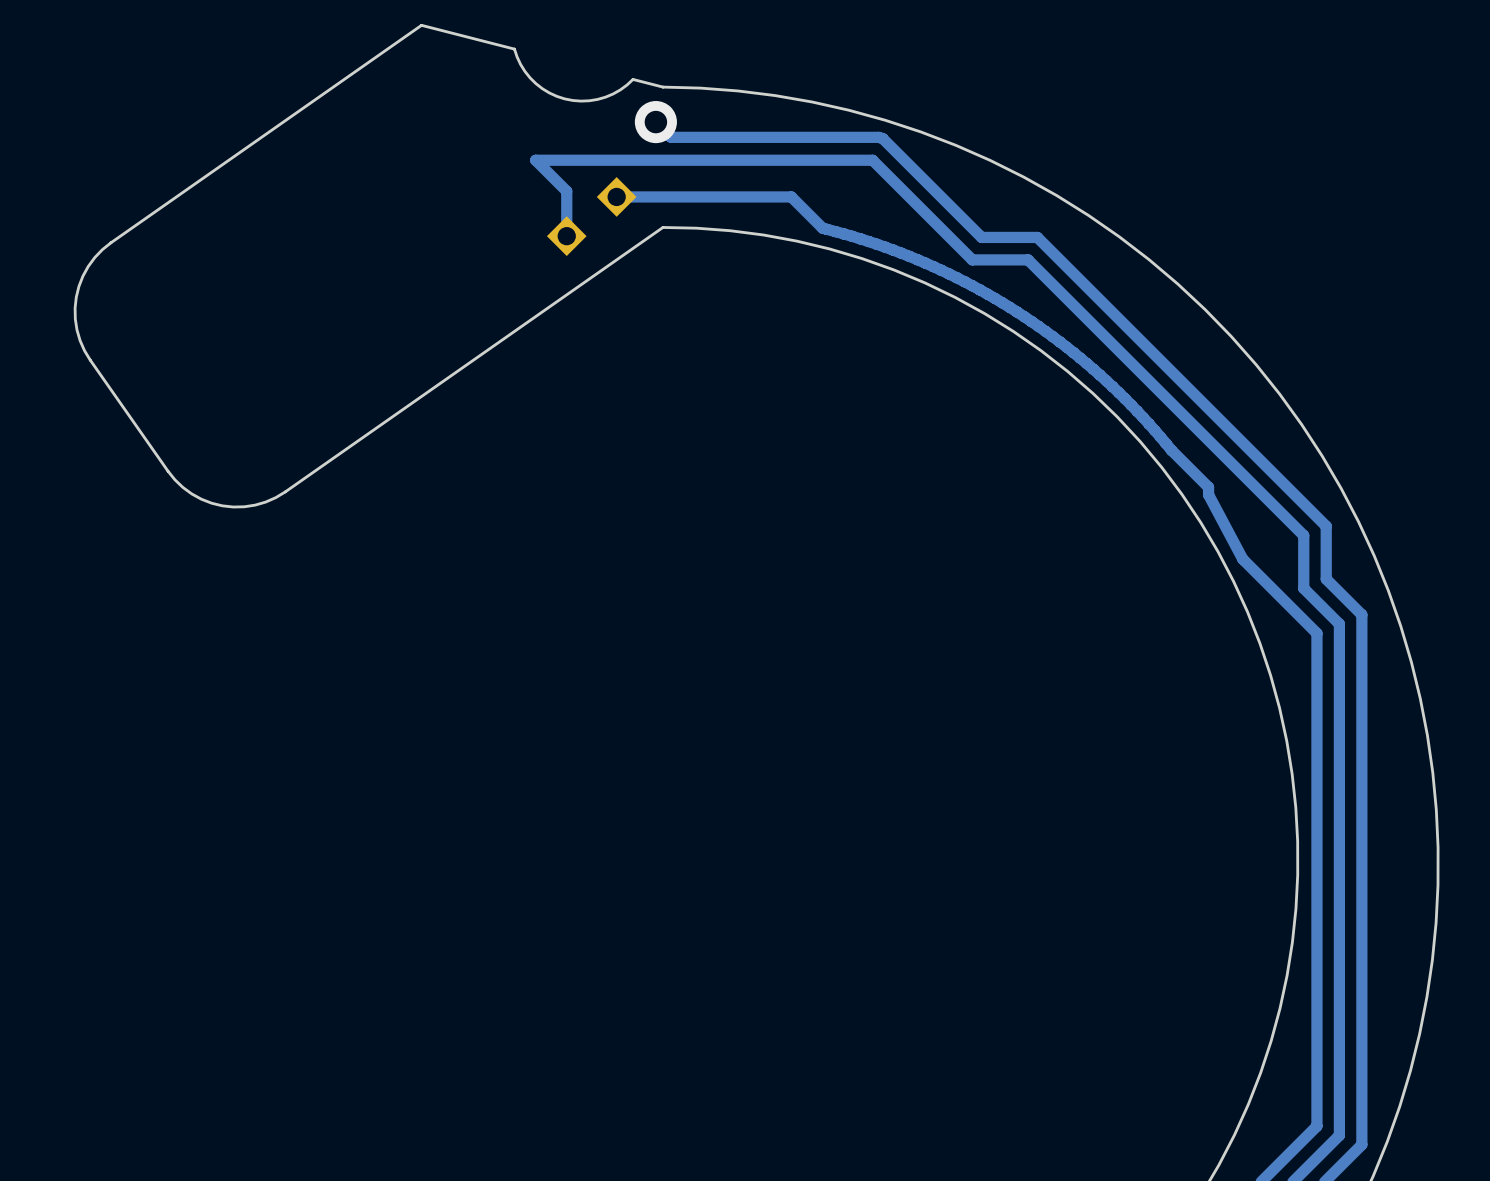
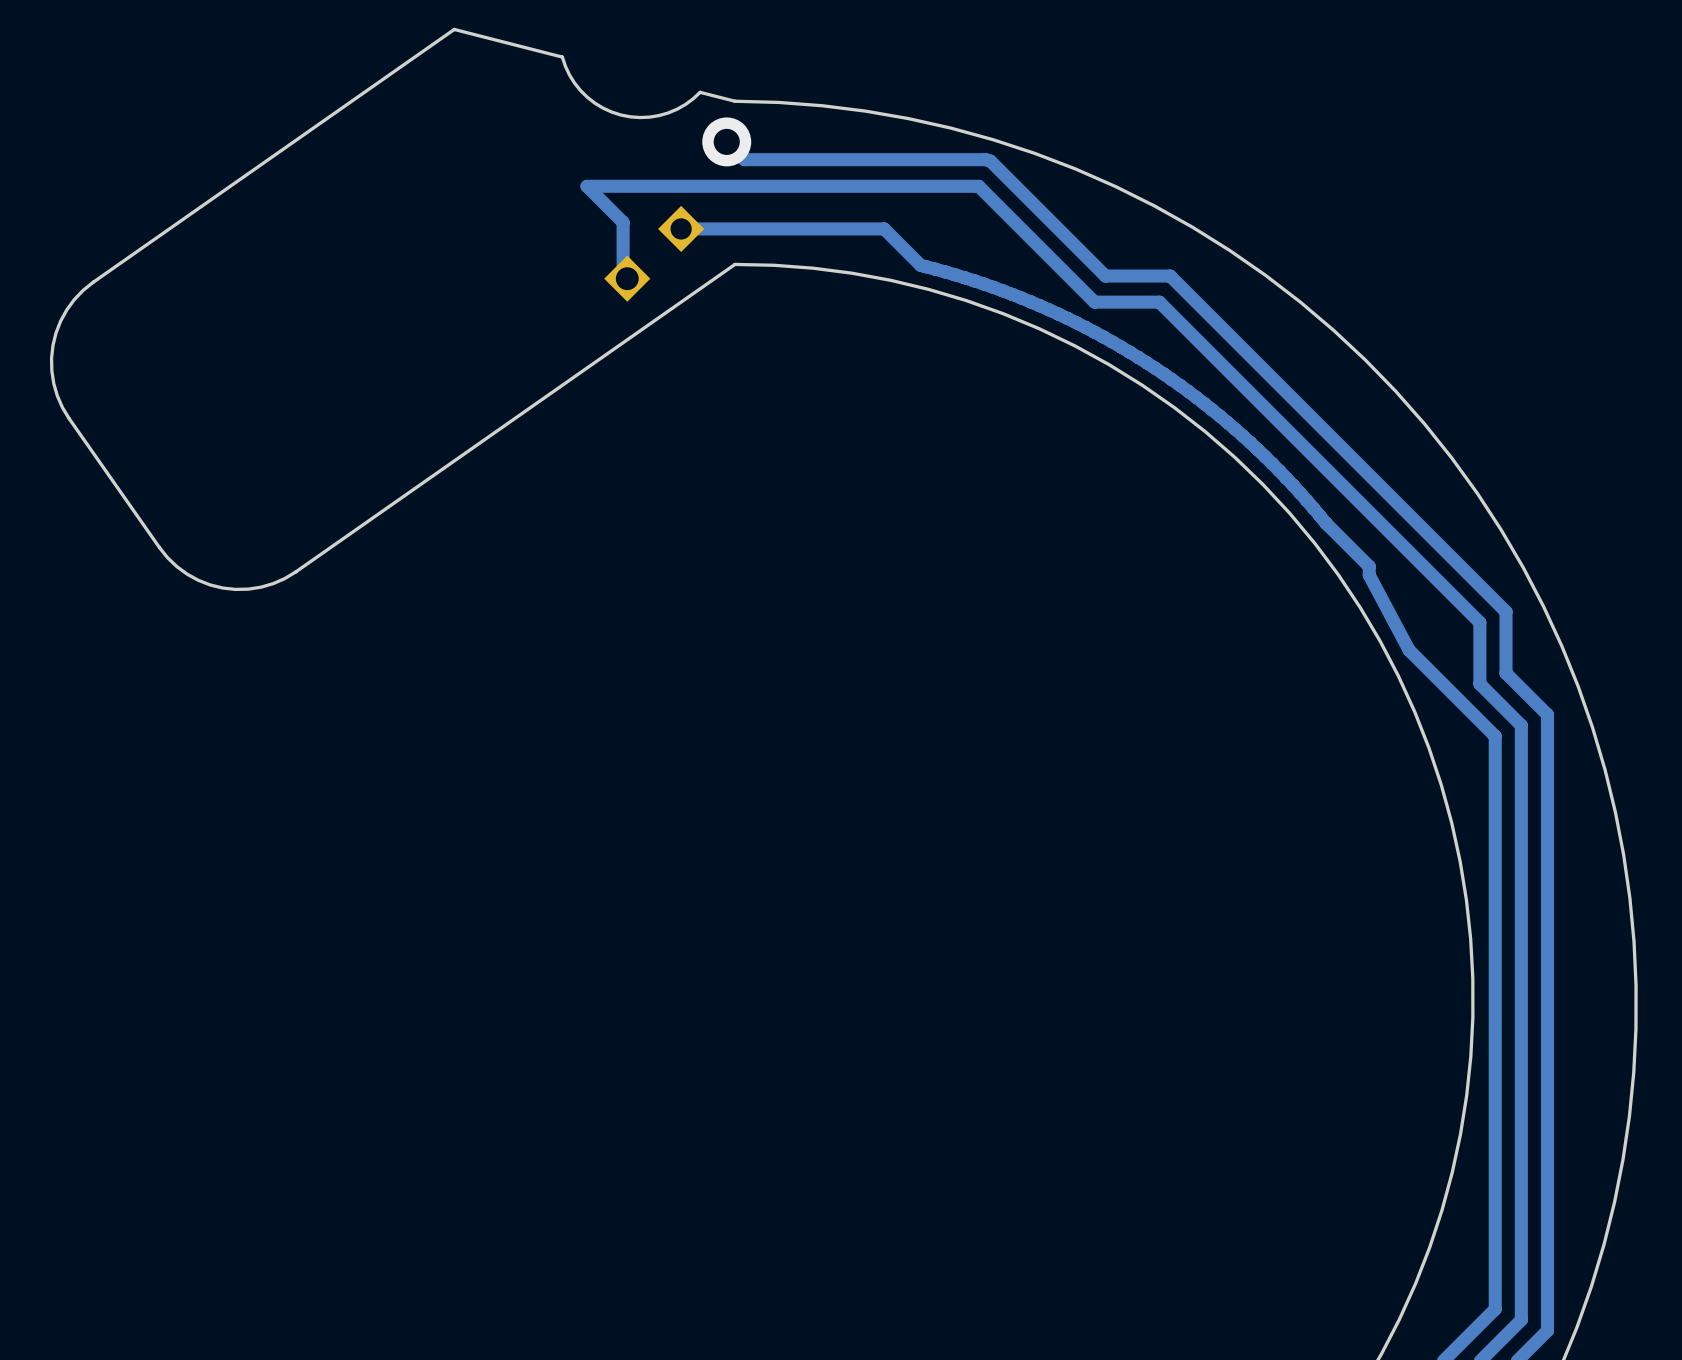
part footprint: [546, 216, 587, 257] -> [604, 255, 651, 302]

